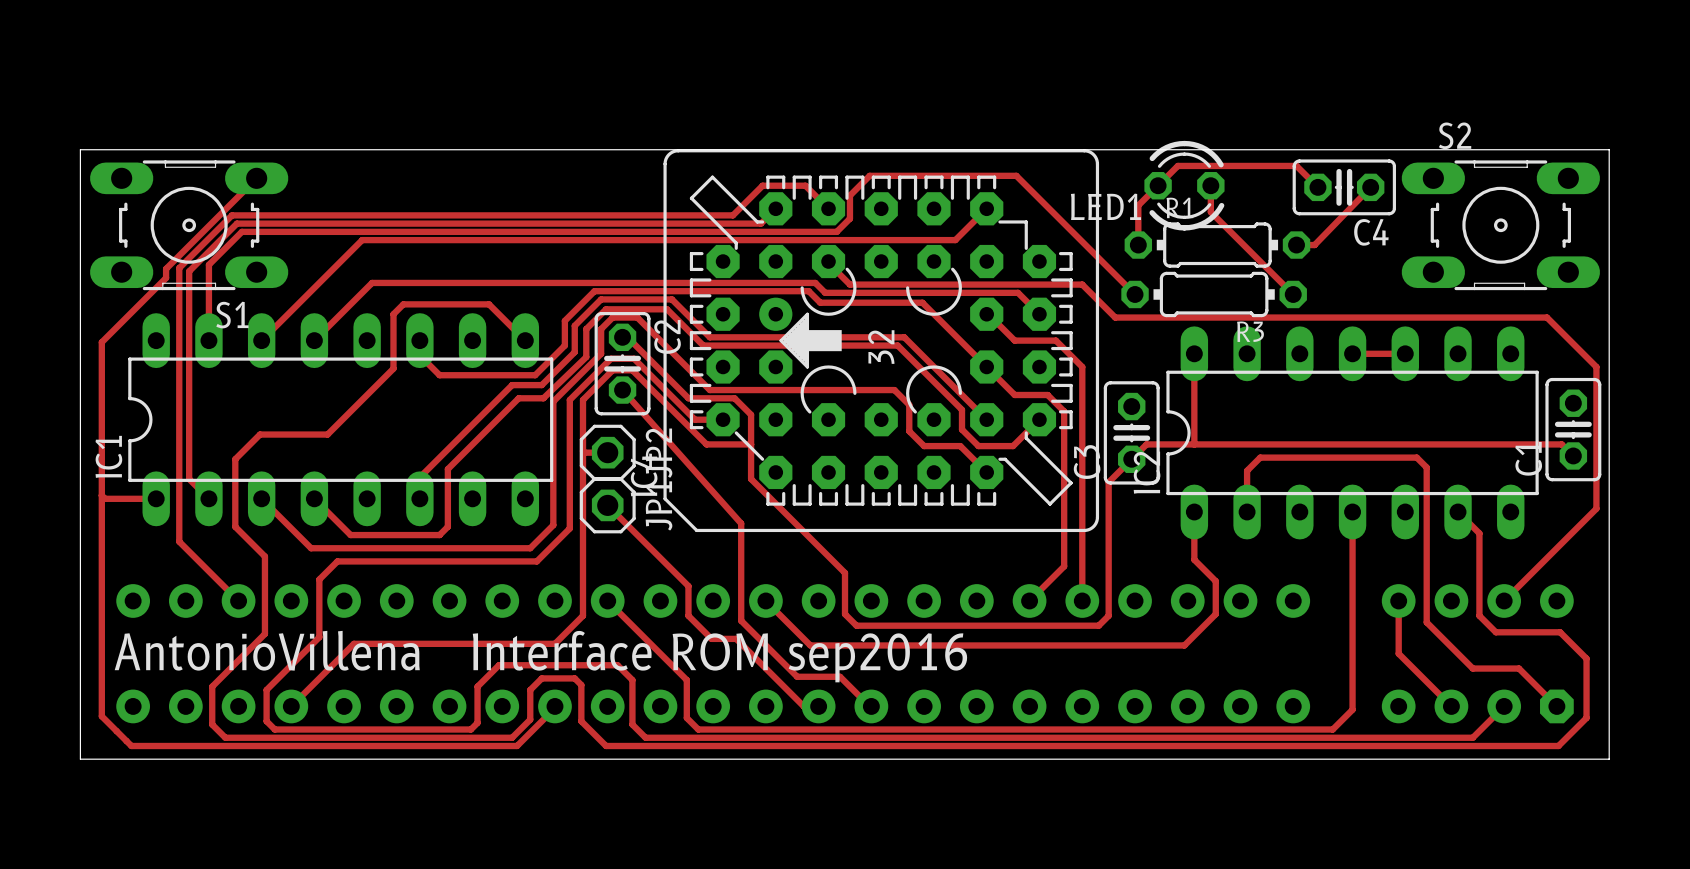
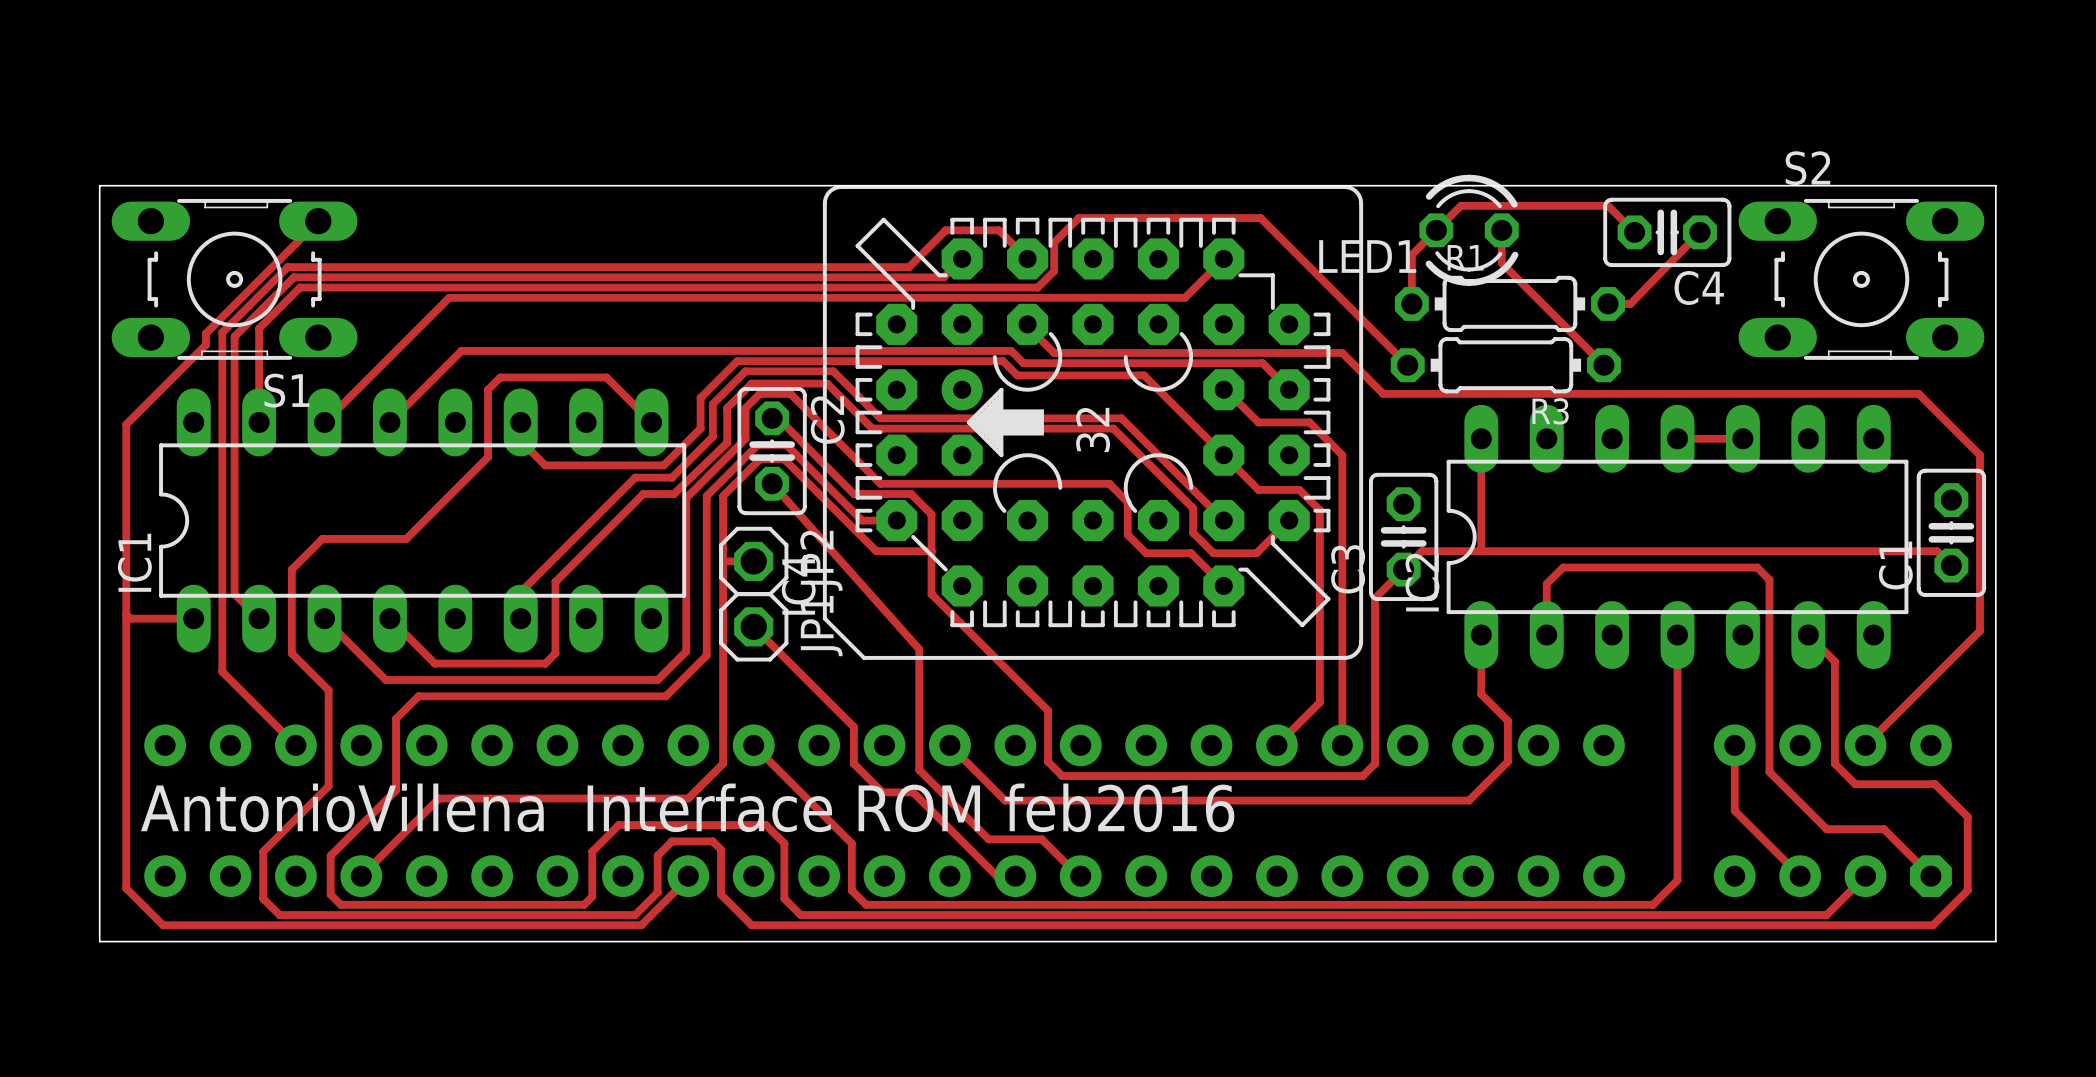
text: Interface ROM sep2016 (719, 656) -> Interface ROM feb2016 (910, 807)

